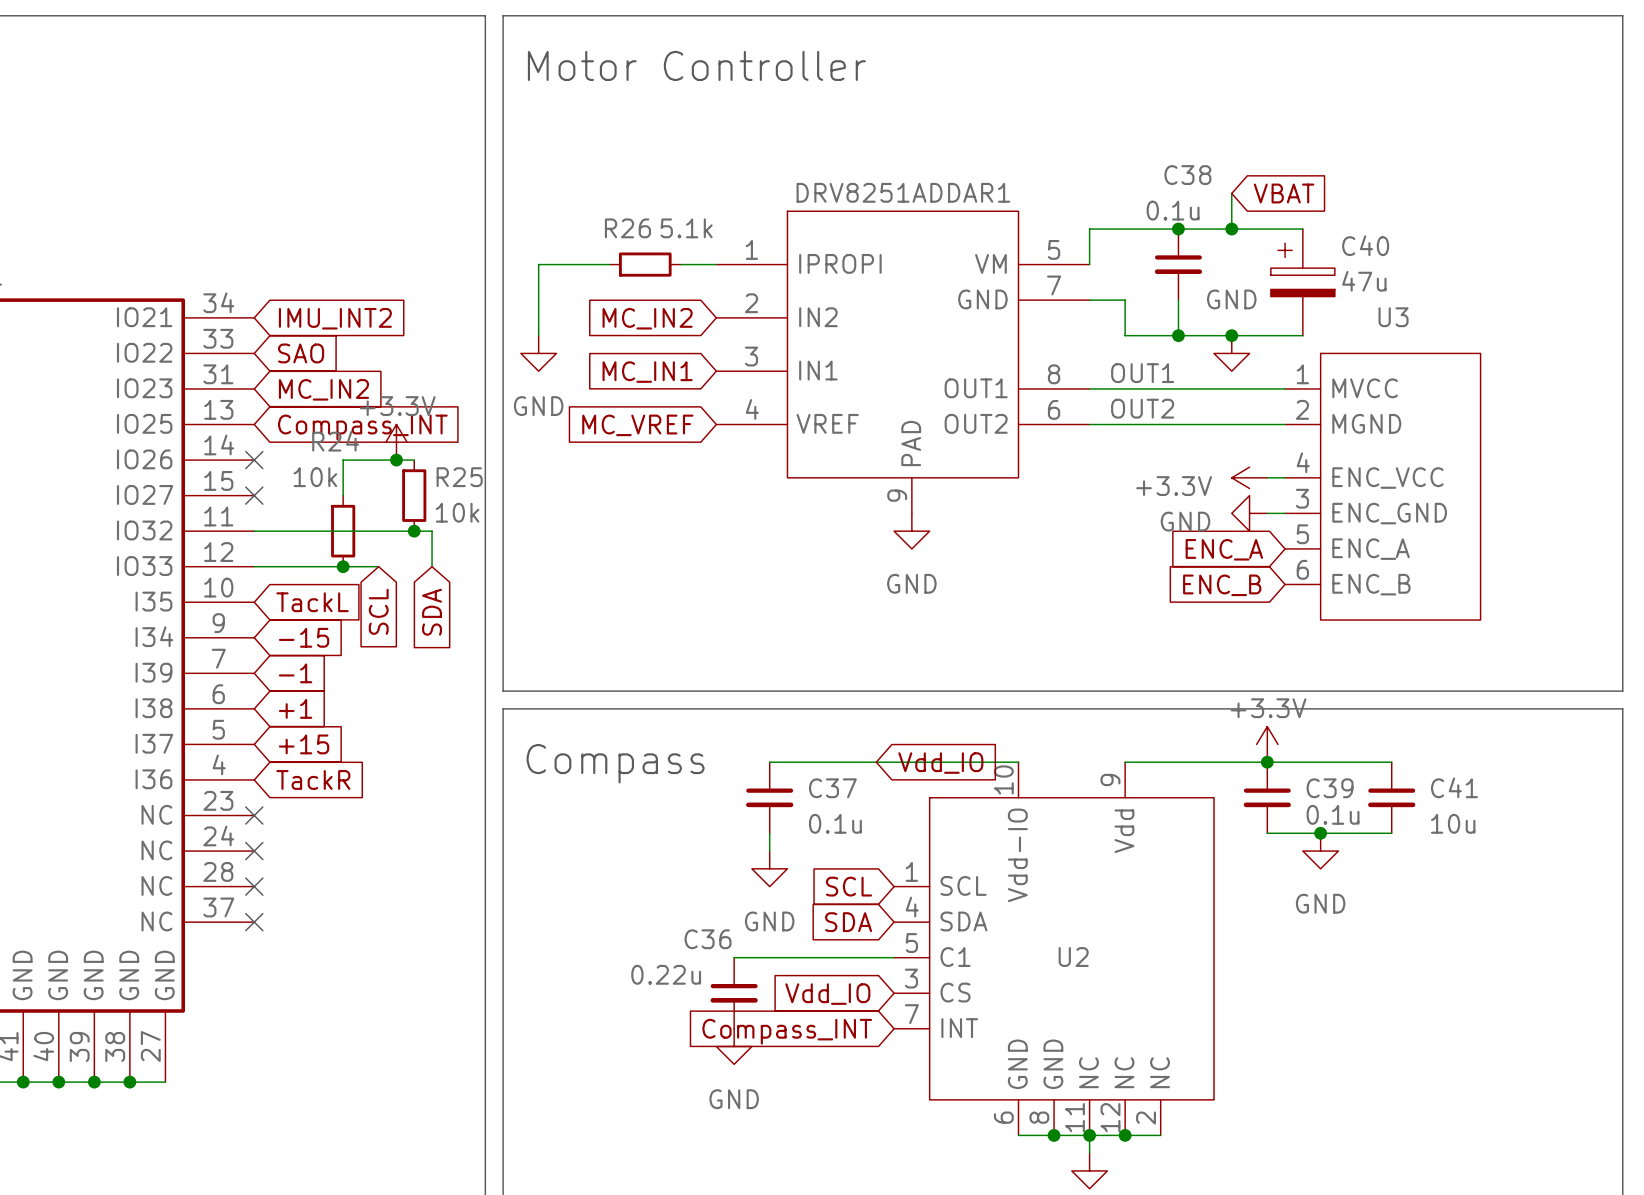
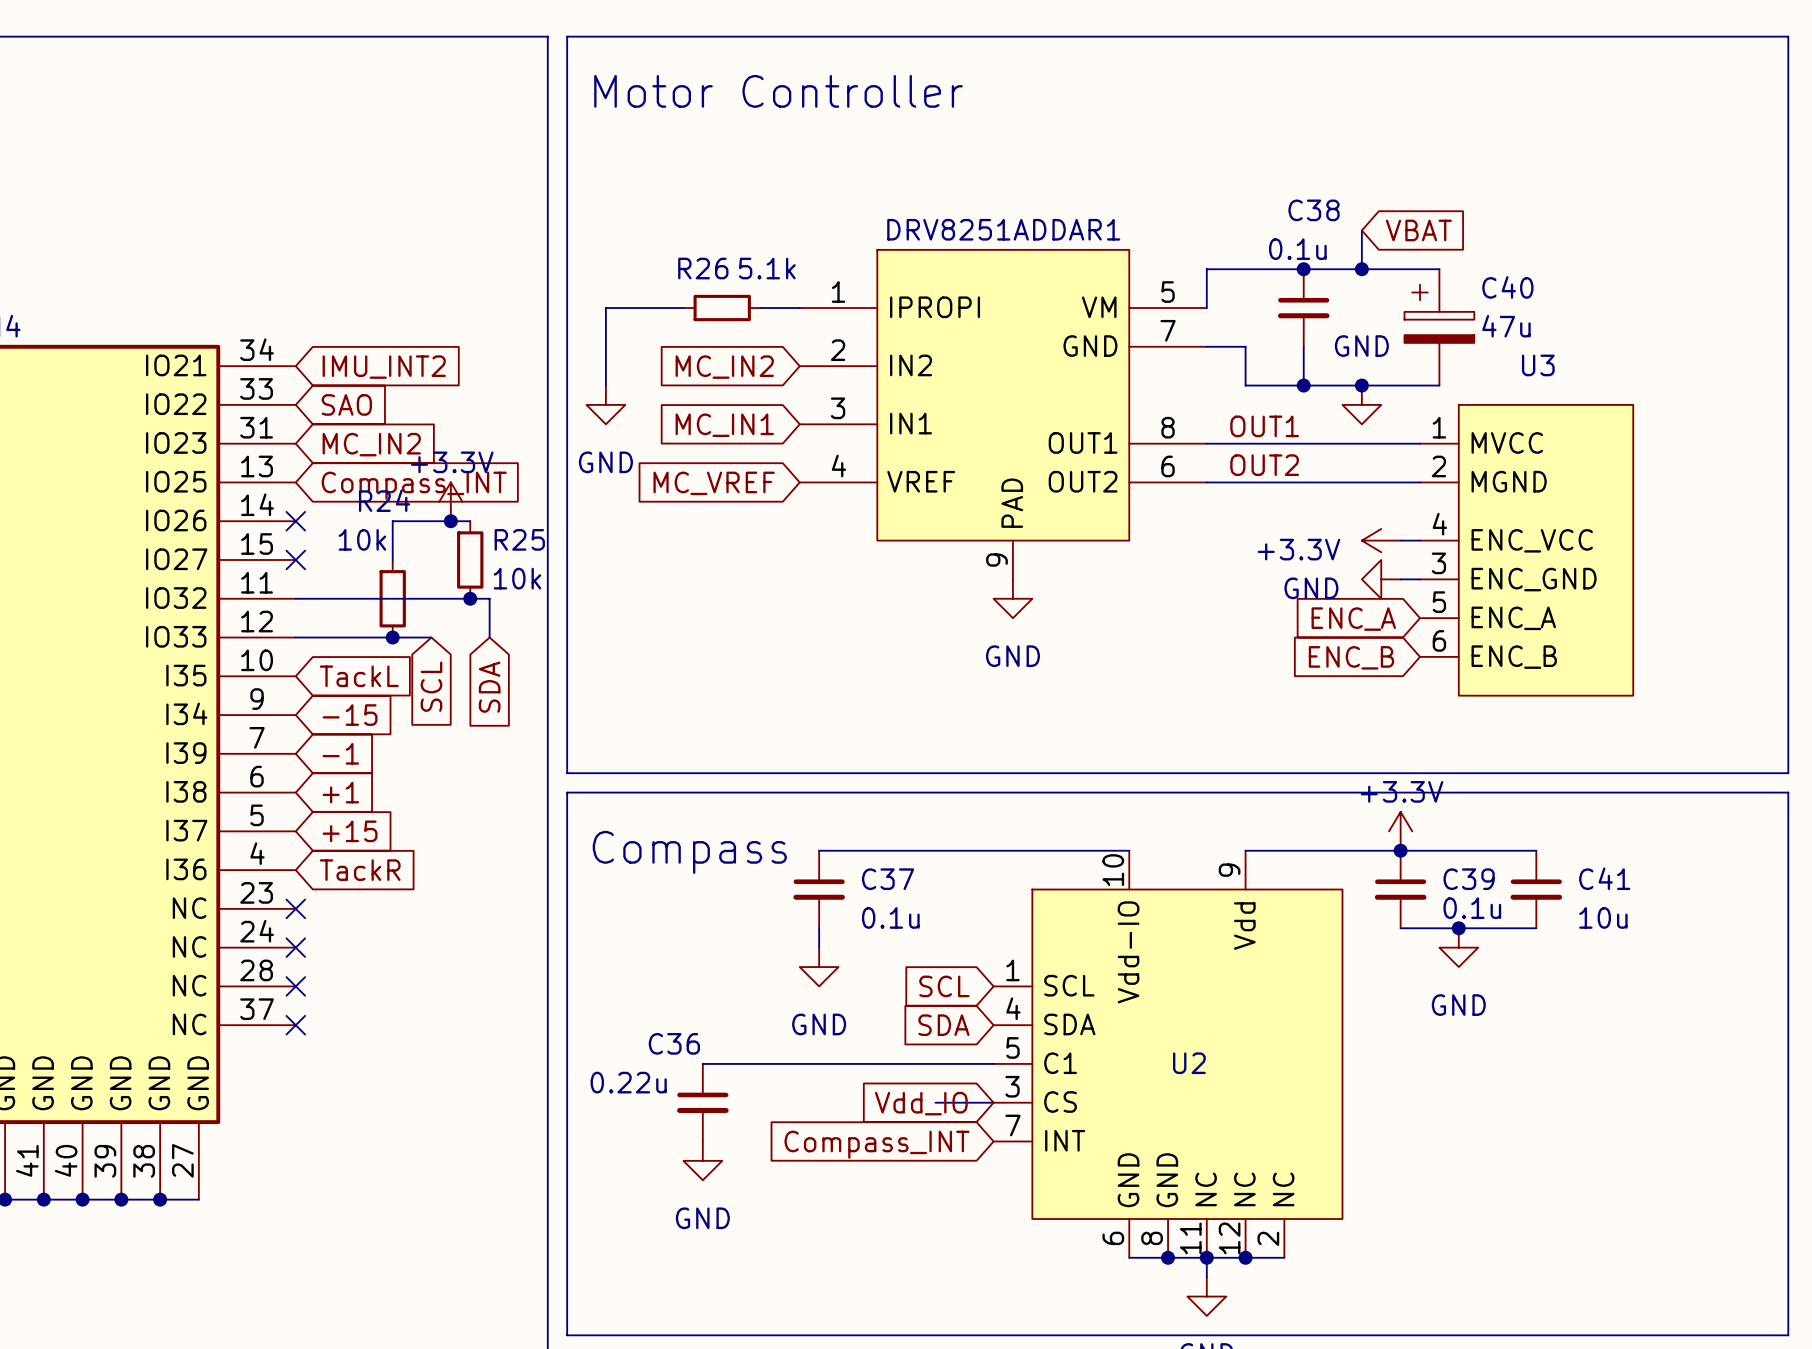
wire: none -> (819, 850) (857, 850)
global label: Vdd_IO (940, 763) -> none
C37 position: (769, 797) -> (819, 889)
wire: (769, 833) (769, 851) -> (819, 928) (819, 947)
power symbol position: GND (769, 868) -> GND (819, 967)
wire: none -> (702, 1063) (819, 1063)
C36 position: (734, 993) -> (702, 1102)
wire: none -> (935, 1102) (993, 1102)
power symbol: none -> GND (702, 1160)
power symbol: GND (734, 1046) -> none

